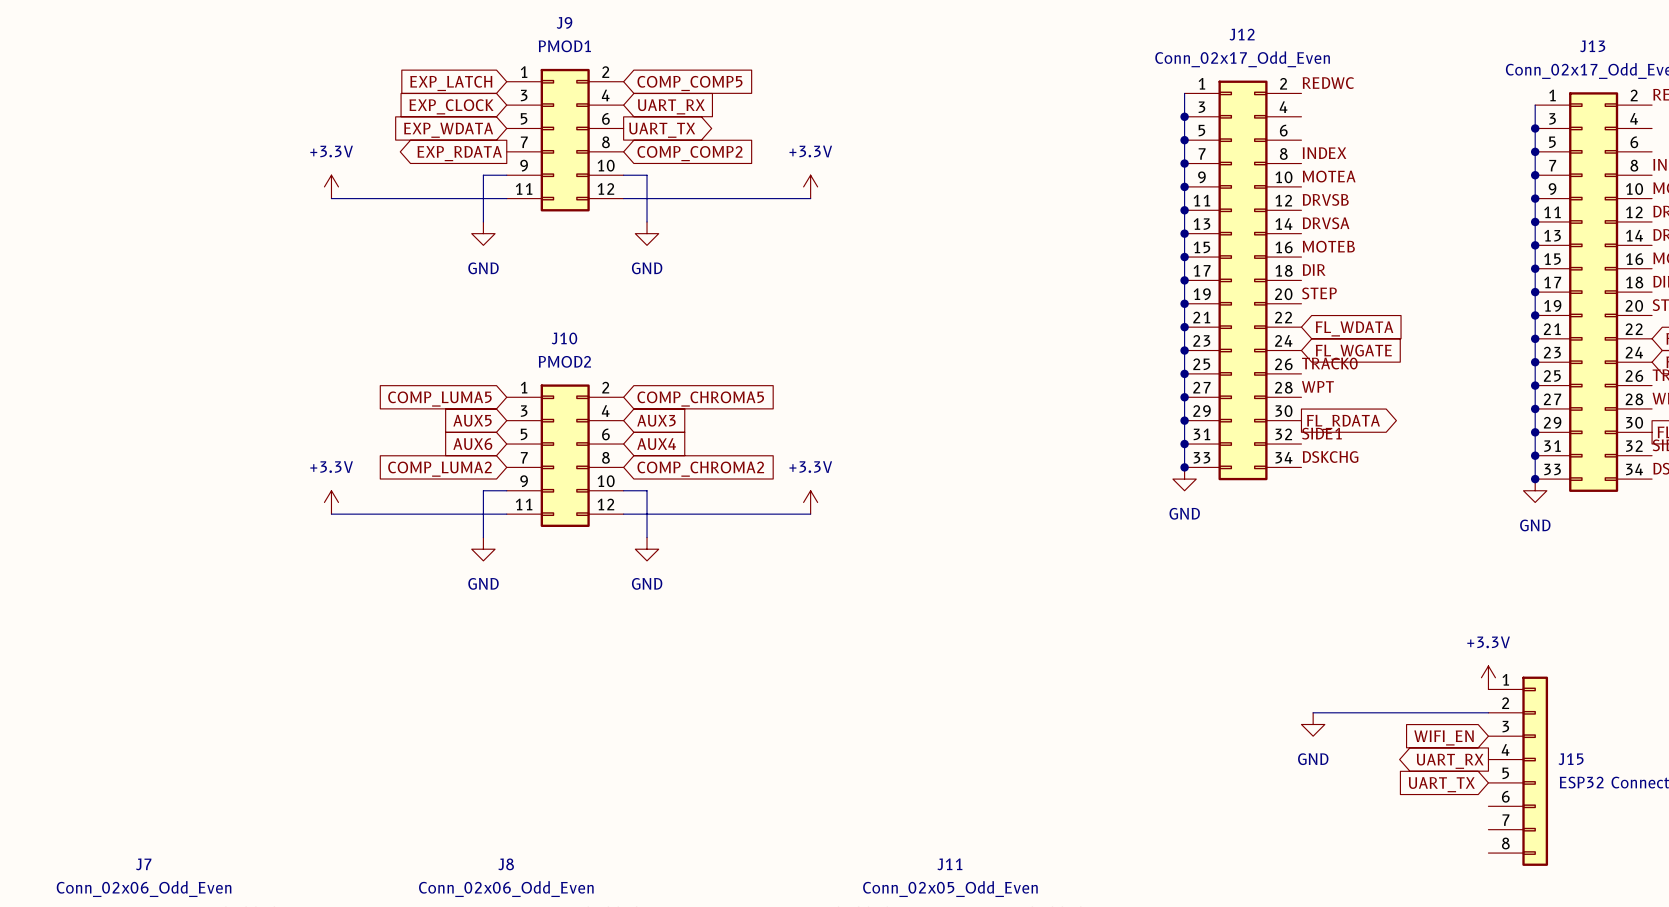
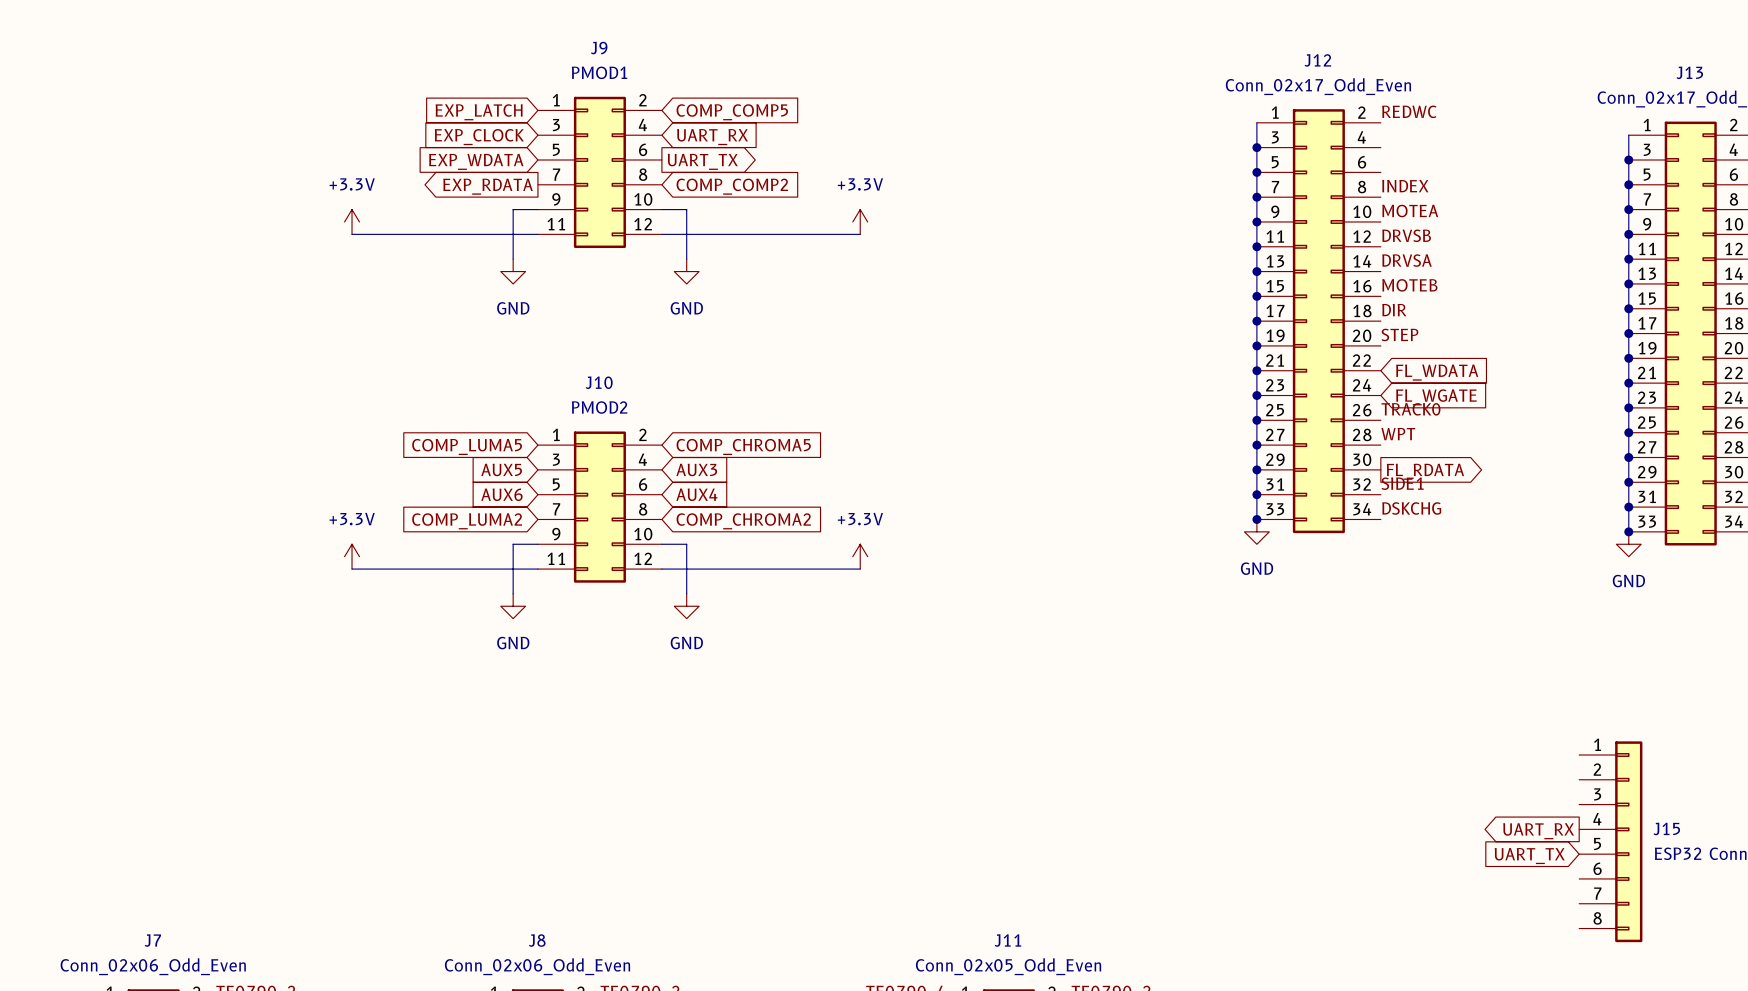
power symbol: +3.3V (1488, 677) -> none
wire: (1313, 712) (1488, 712) -> none
power symbol: GND (1313, 724) -> none
global label: WIFI_EN (1444, 737) -> none

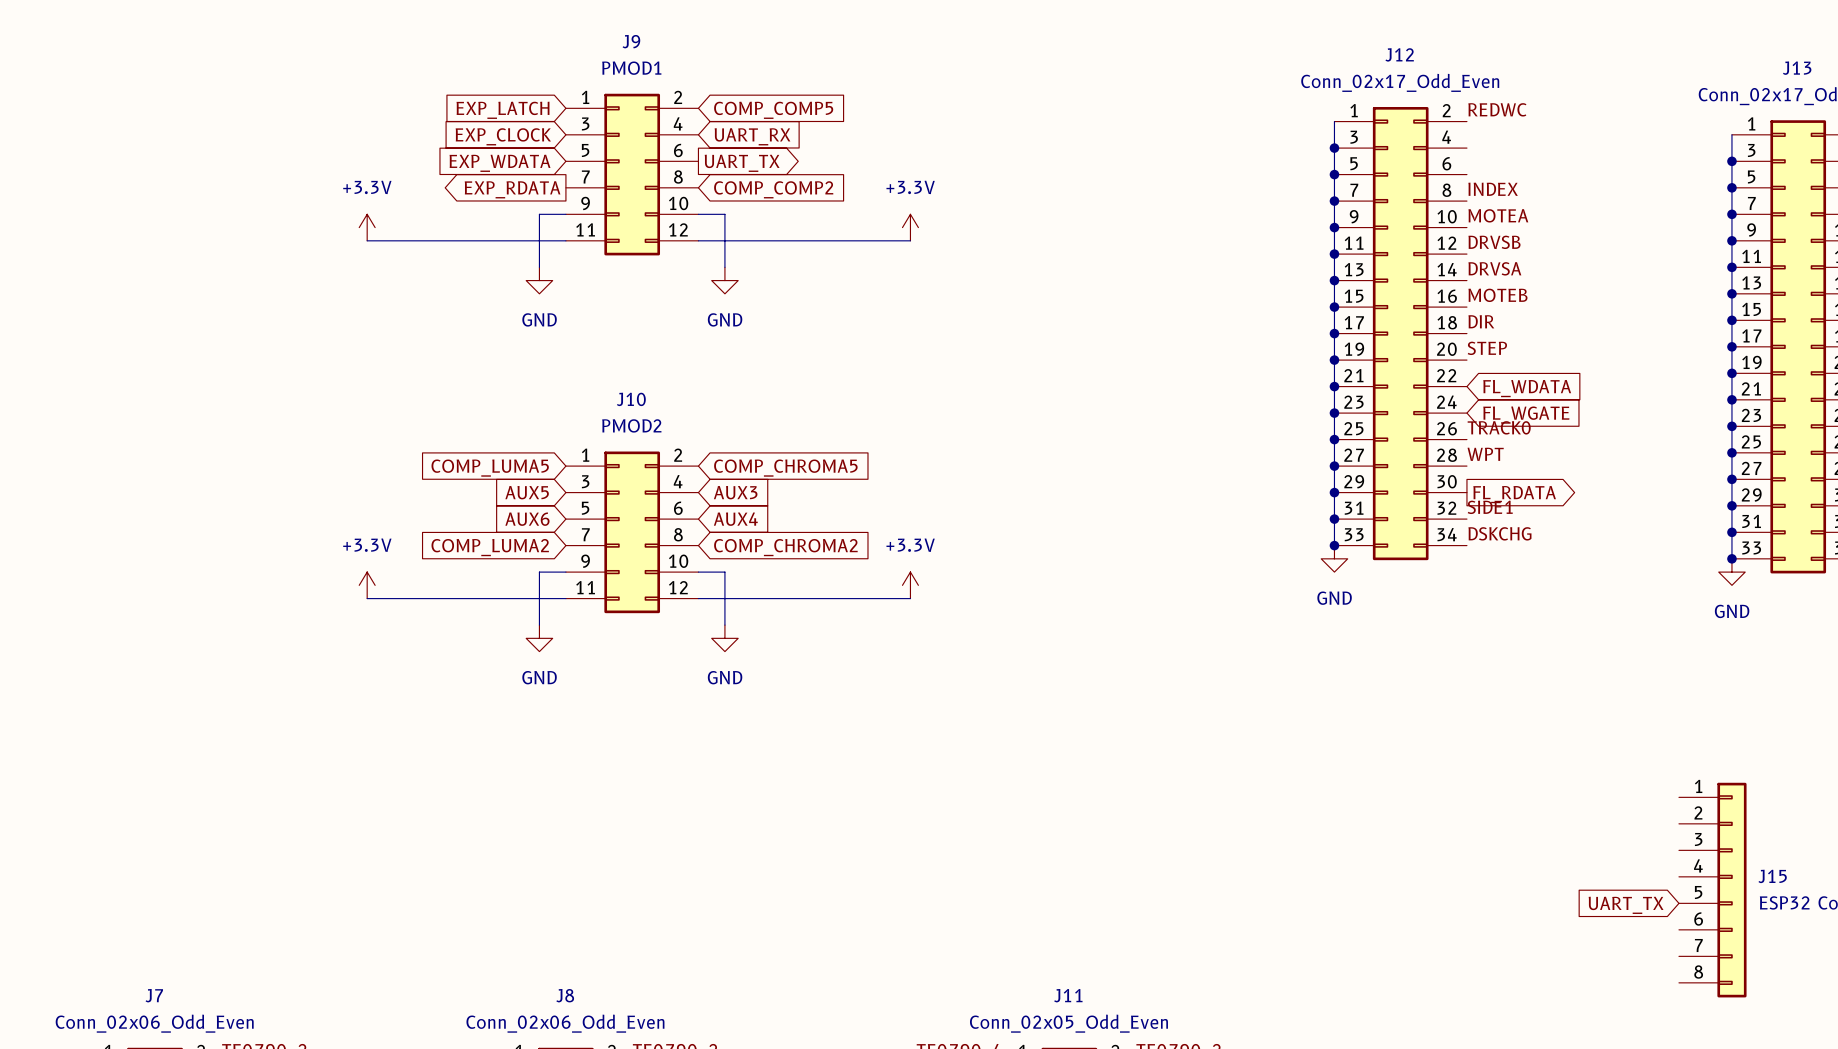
global label: UART_RX (1538, 831) -> none

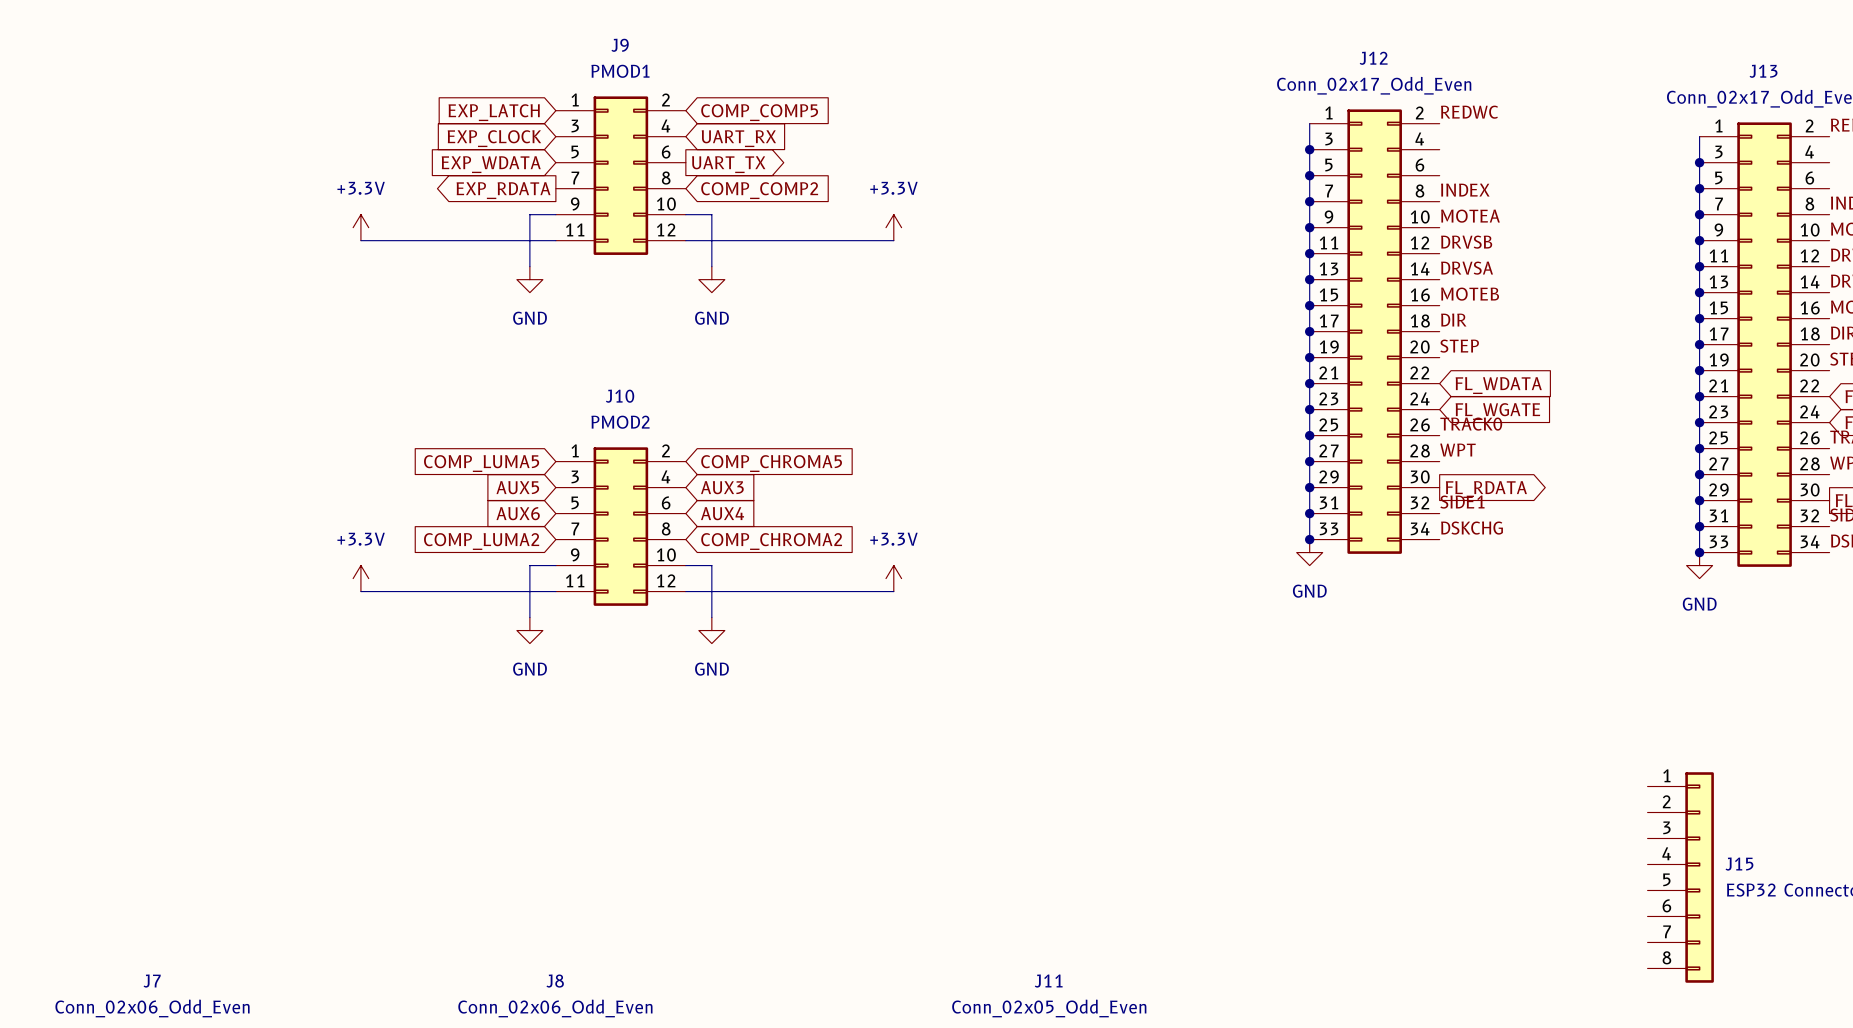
global label: UART_TX (1626, 905) -> none

